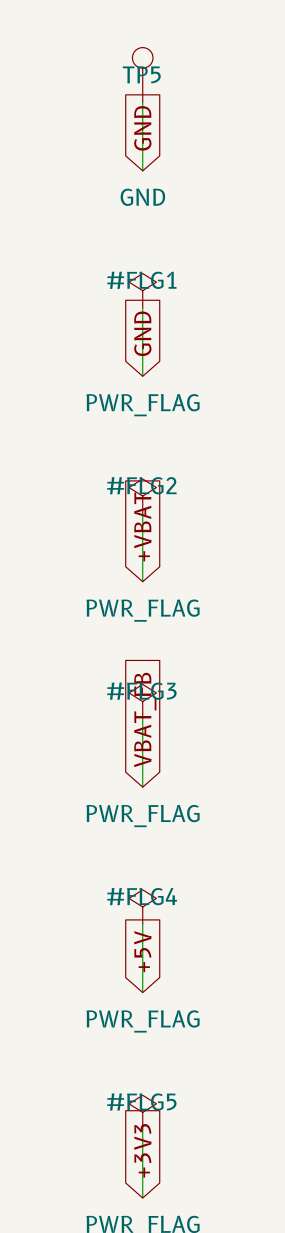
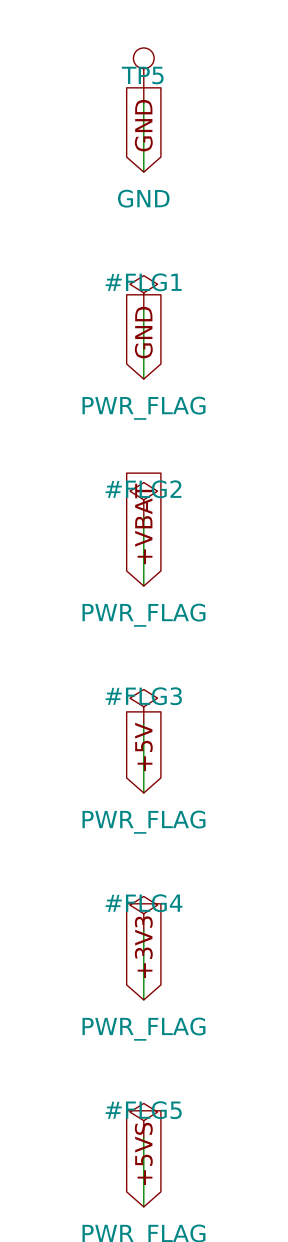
global label: VBAT_FB (145, 719) -> +5V (143, 746)
global label: +5V (142, 951) -> +3V3 (143, 947)
global label: +3V3 (142, 1150) -> +5VS (143, 1153)

